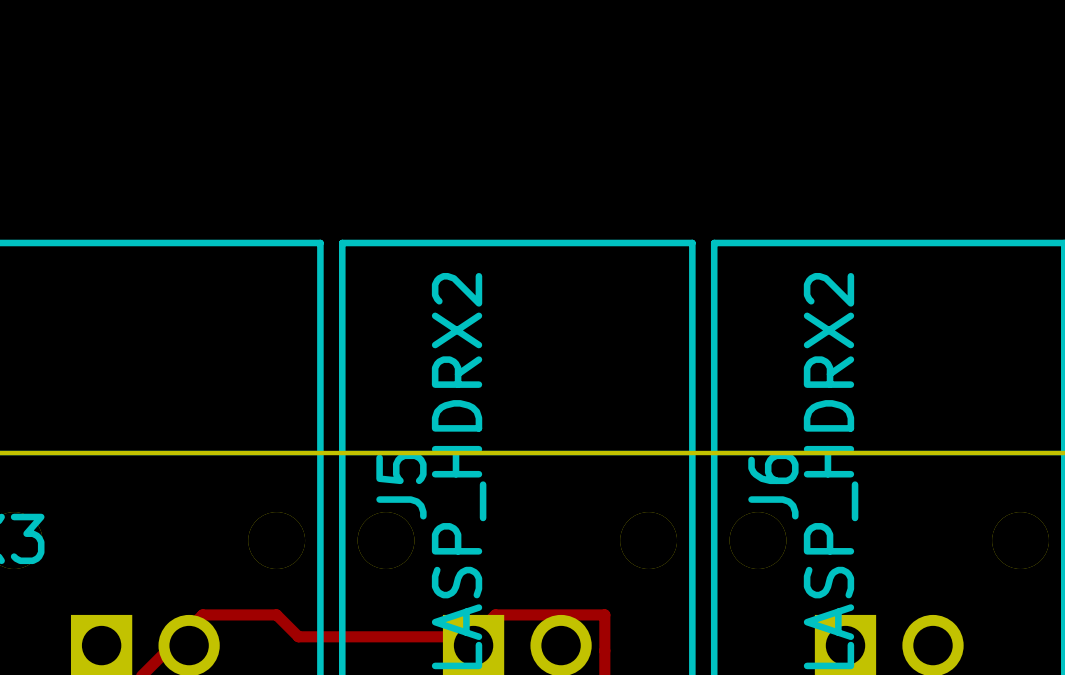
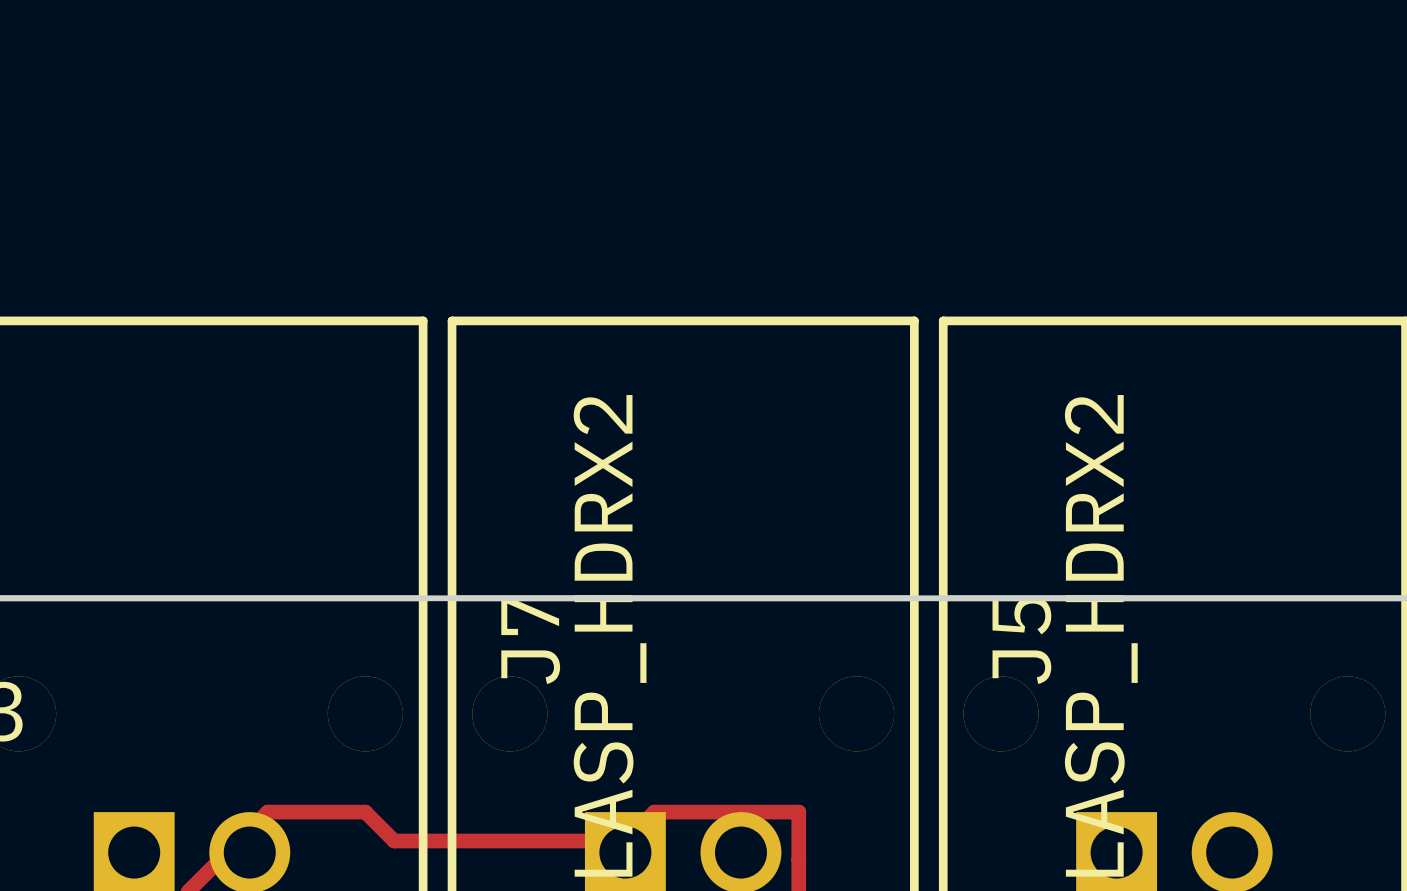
J5 name: J5 (401, 486) -> J7 (530, 640)
J6 name: J6 (773, 486) -> J5 (1021, 640)

